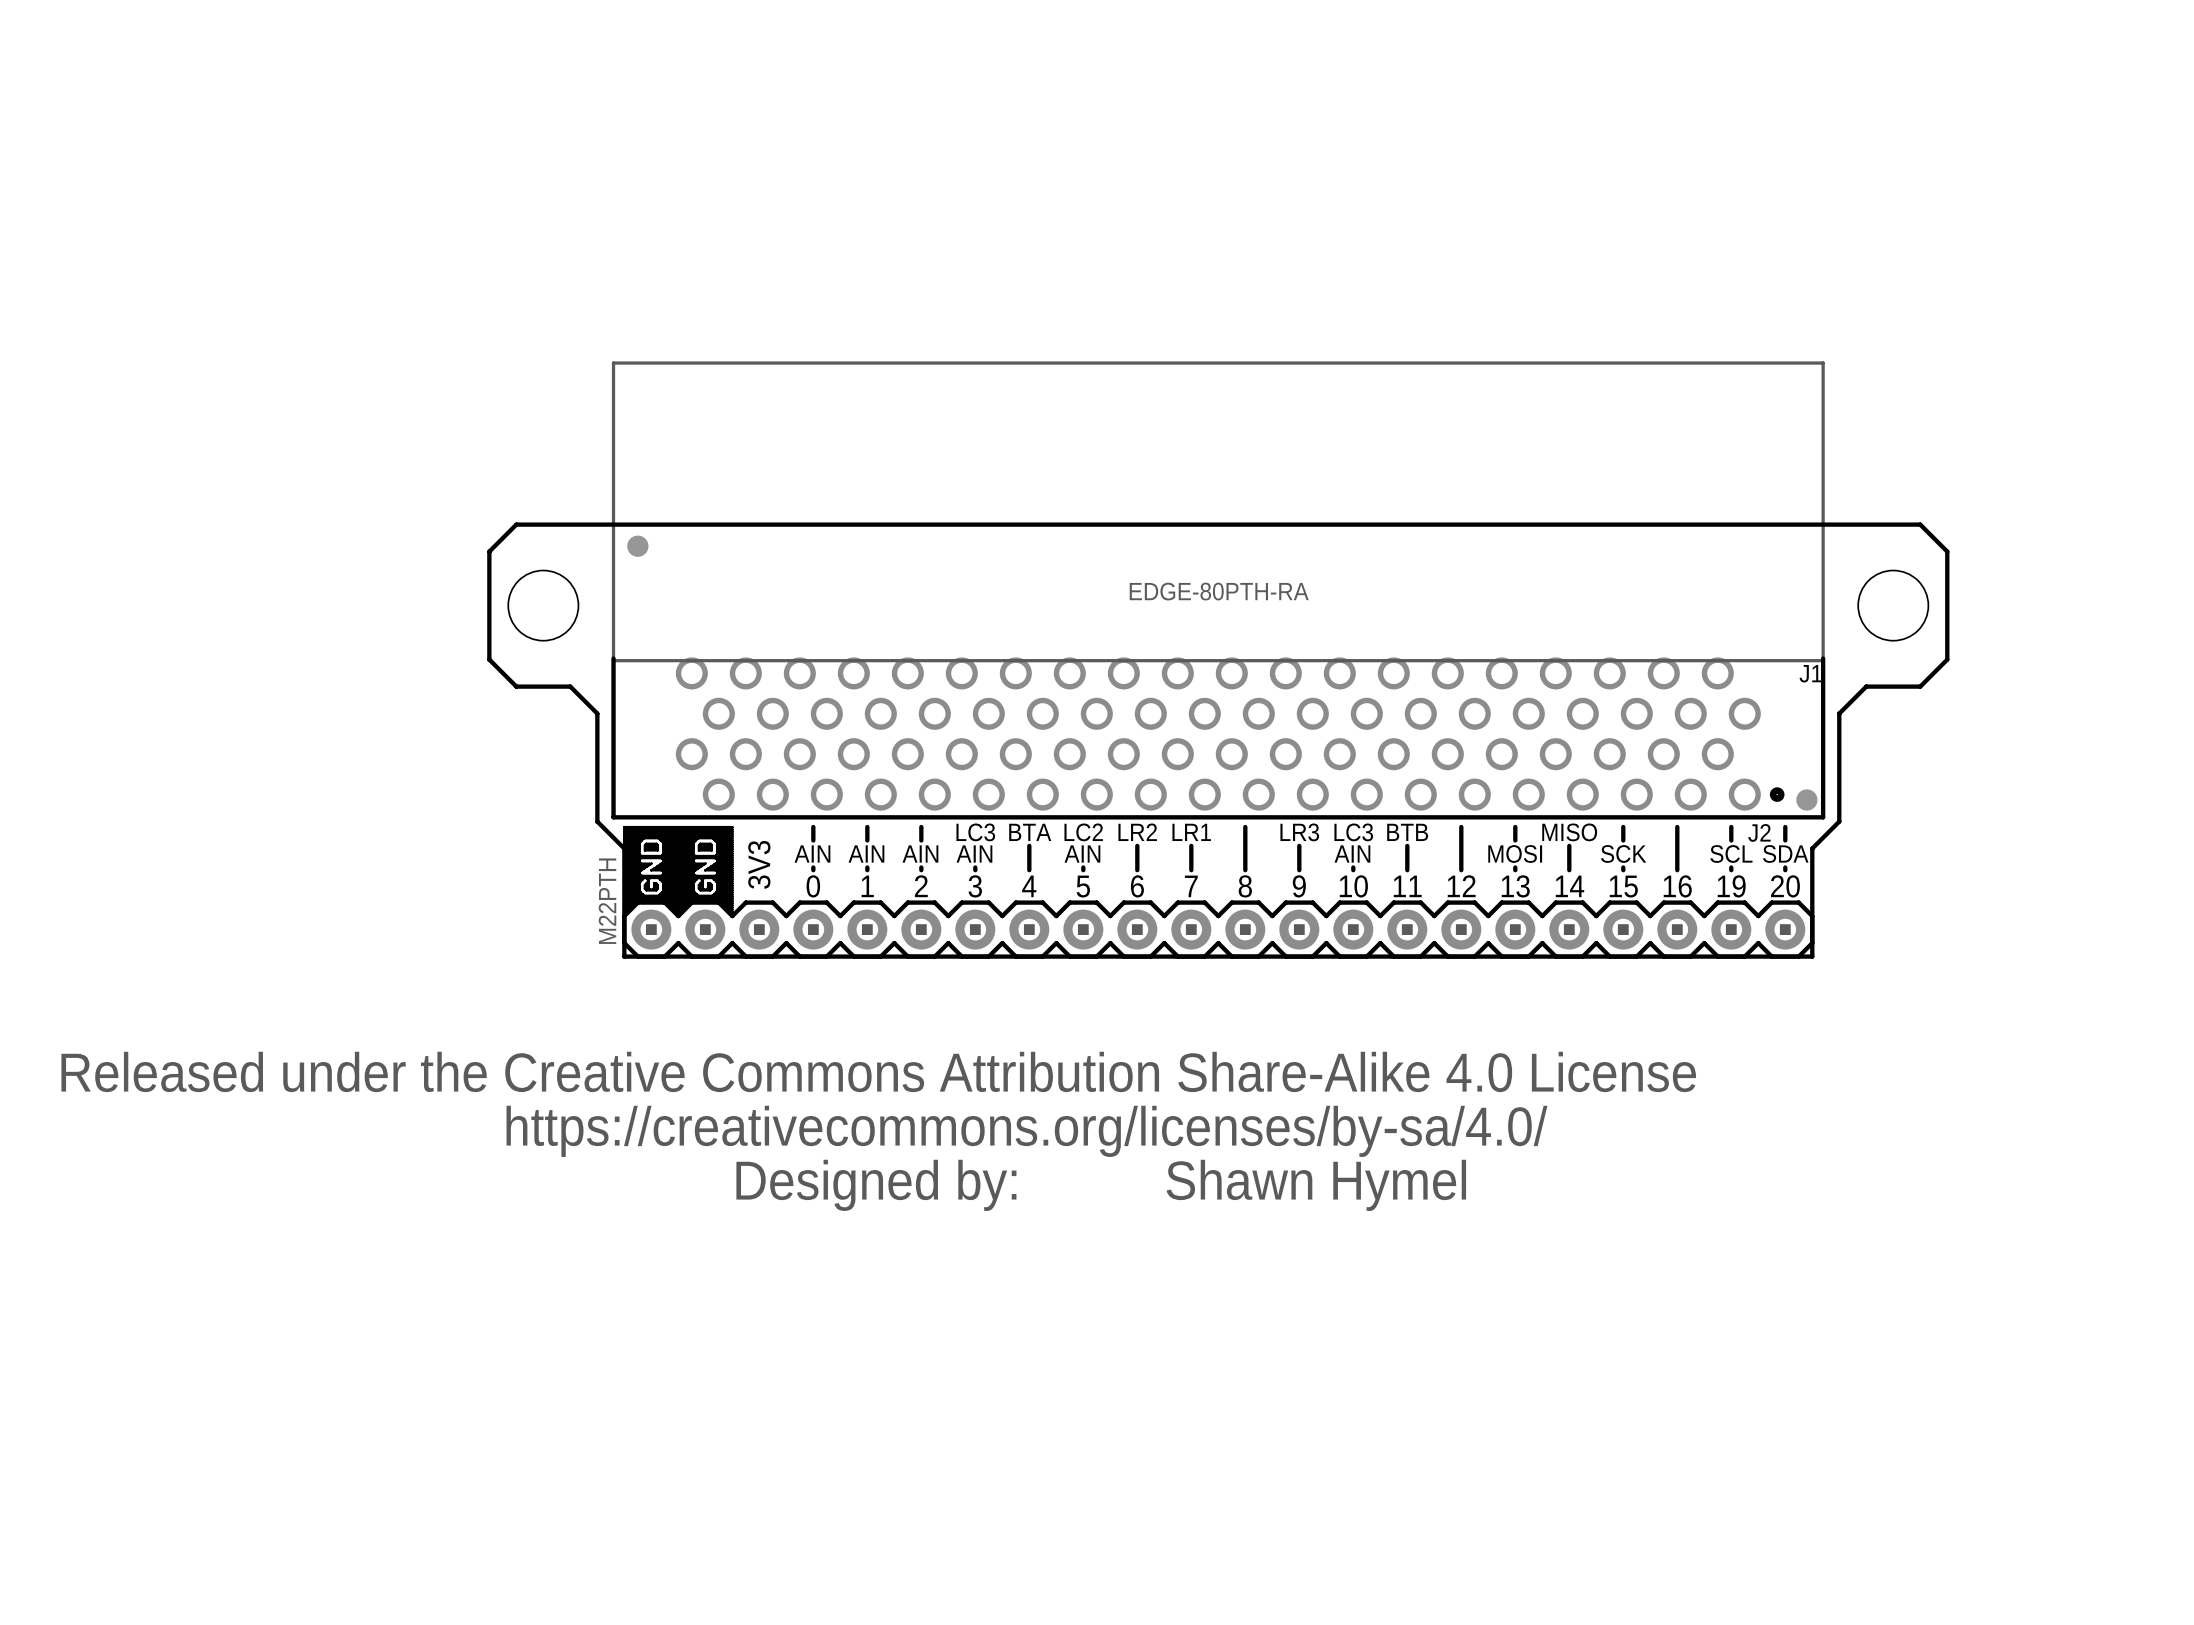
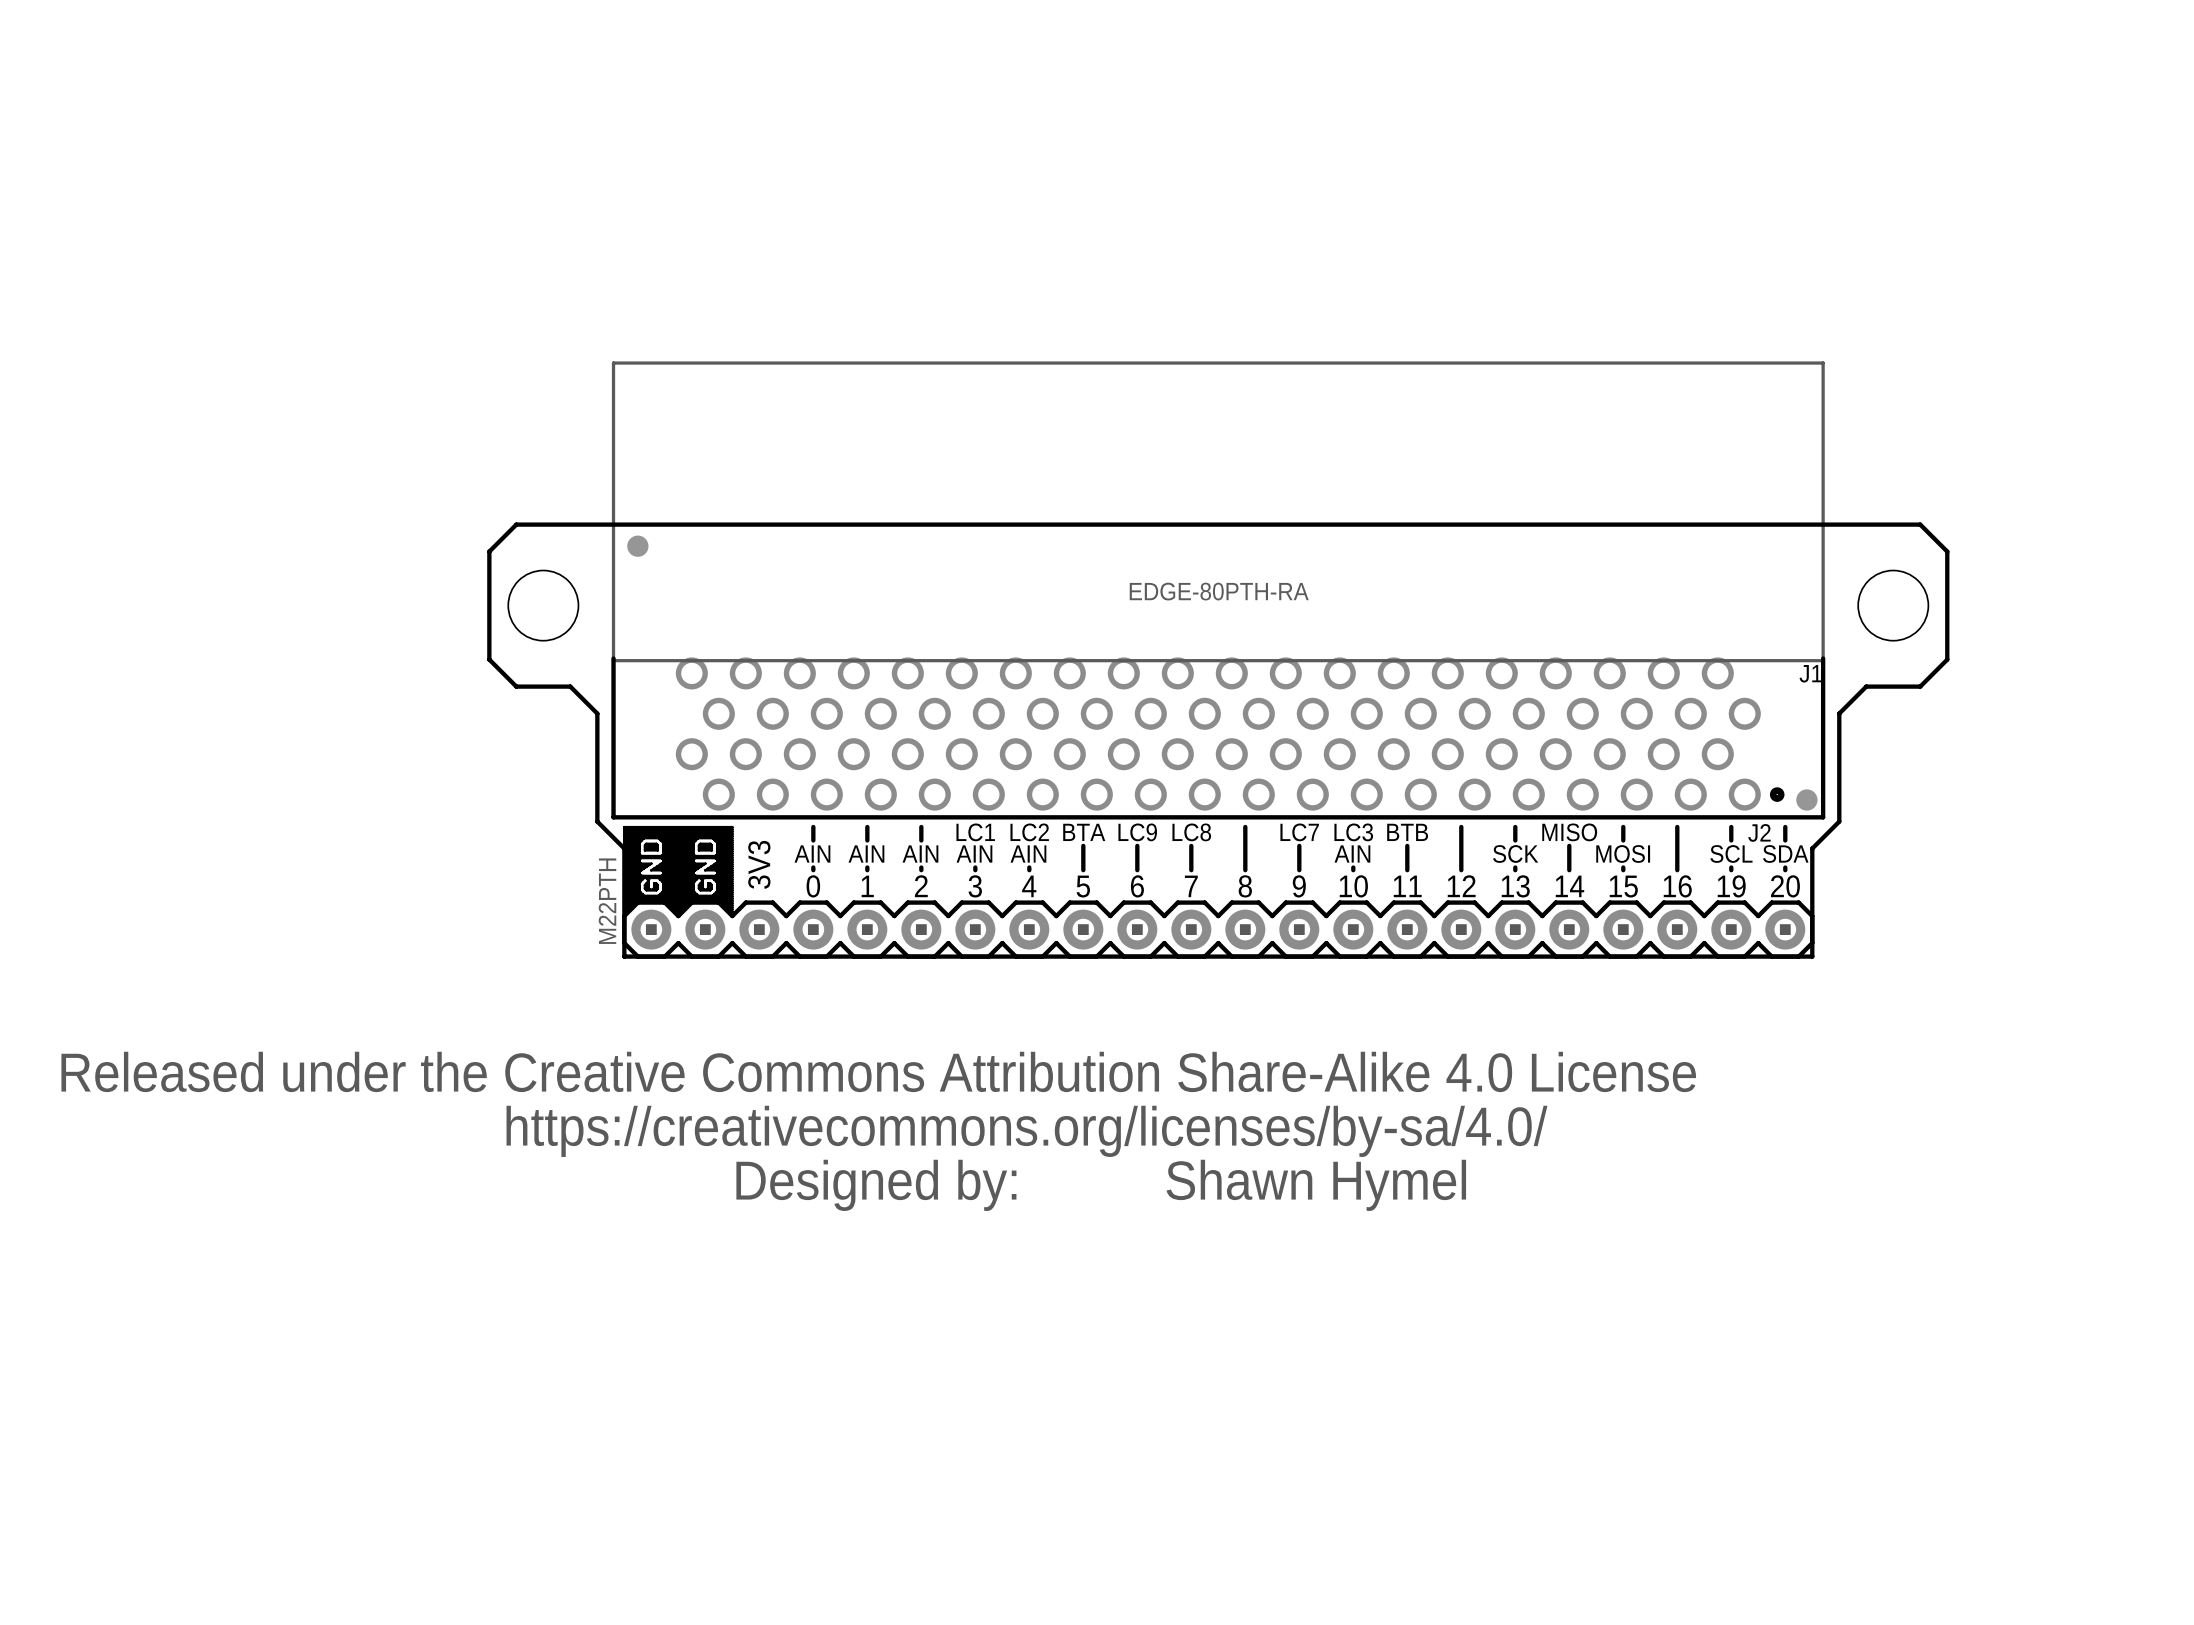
text: LC3 (975, 832) -> LC1 (975, 832)
text: BTA (1030, 832) -> LC2 (1029, 832)
text: LC2 (1083, 832) -> BTA (1084, 832)
text: LR2 (1137, 832) -> LC9 (1137, 832)
text: LR1 (1191, 832) -> LC8 (1191, 832)
text: LR3 (1299, 832) -> LC7 (1299, 832)
line: (1029, 845) (1029, 867) -> (1083, 845) (1083, 867)
text position: AIN (1082, 853) -> AIN (1028, 853)
text: MOSI (1515, 853) -> SCK (1515, 853)
text: SCK (1623, 853) -> MOSI (1623, 853)

